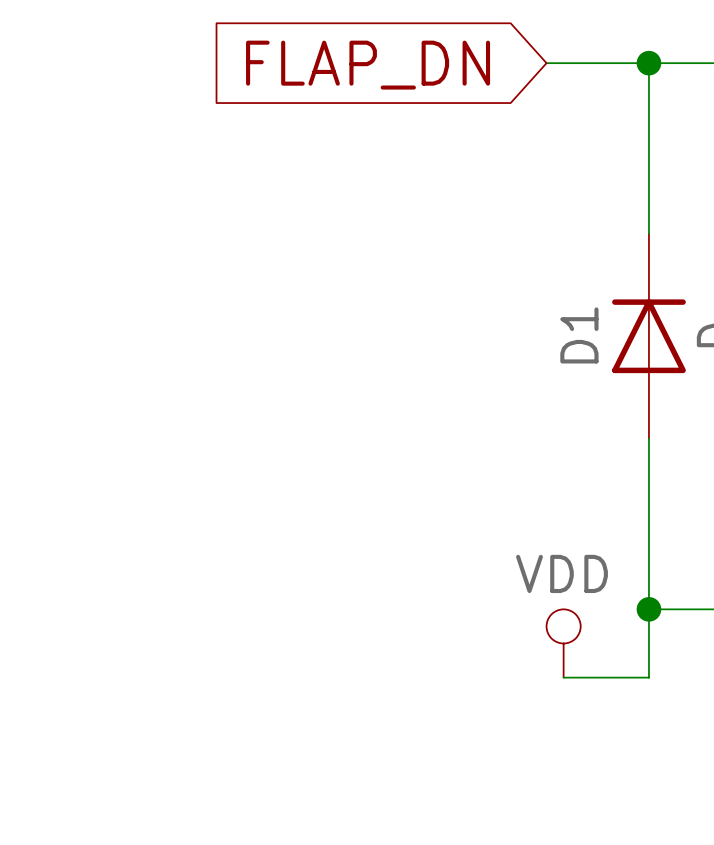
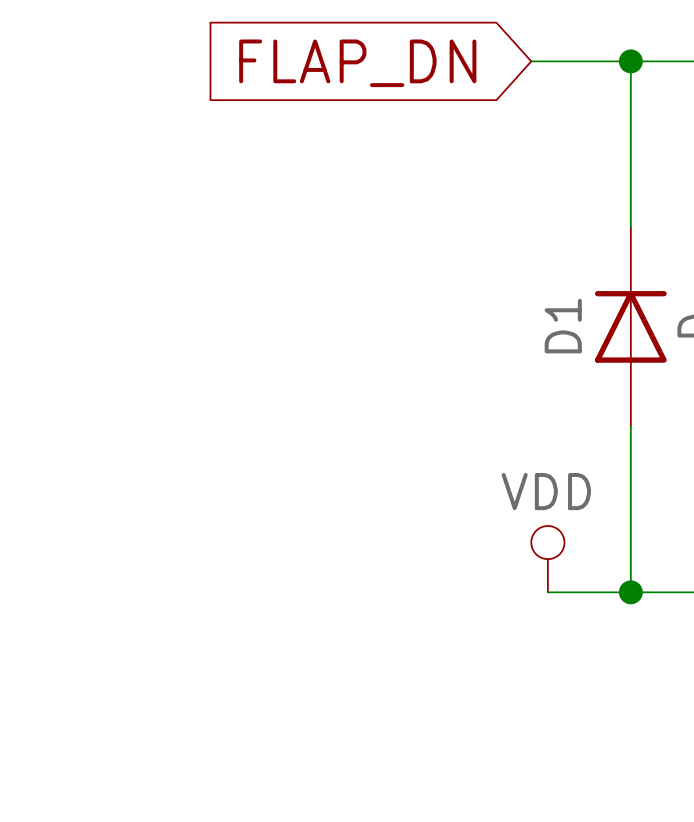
wire: (648, 609) (648, 677) (563, 677) -> (630, 592) (547, 592)
power symbol position: VDD (563, 643) -> VDD (547, 559)

